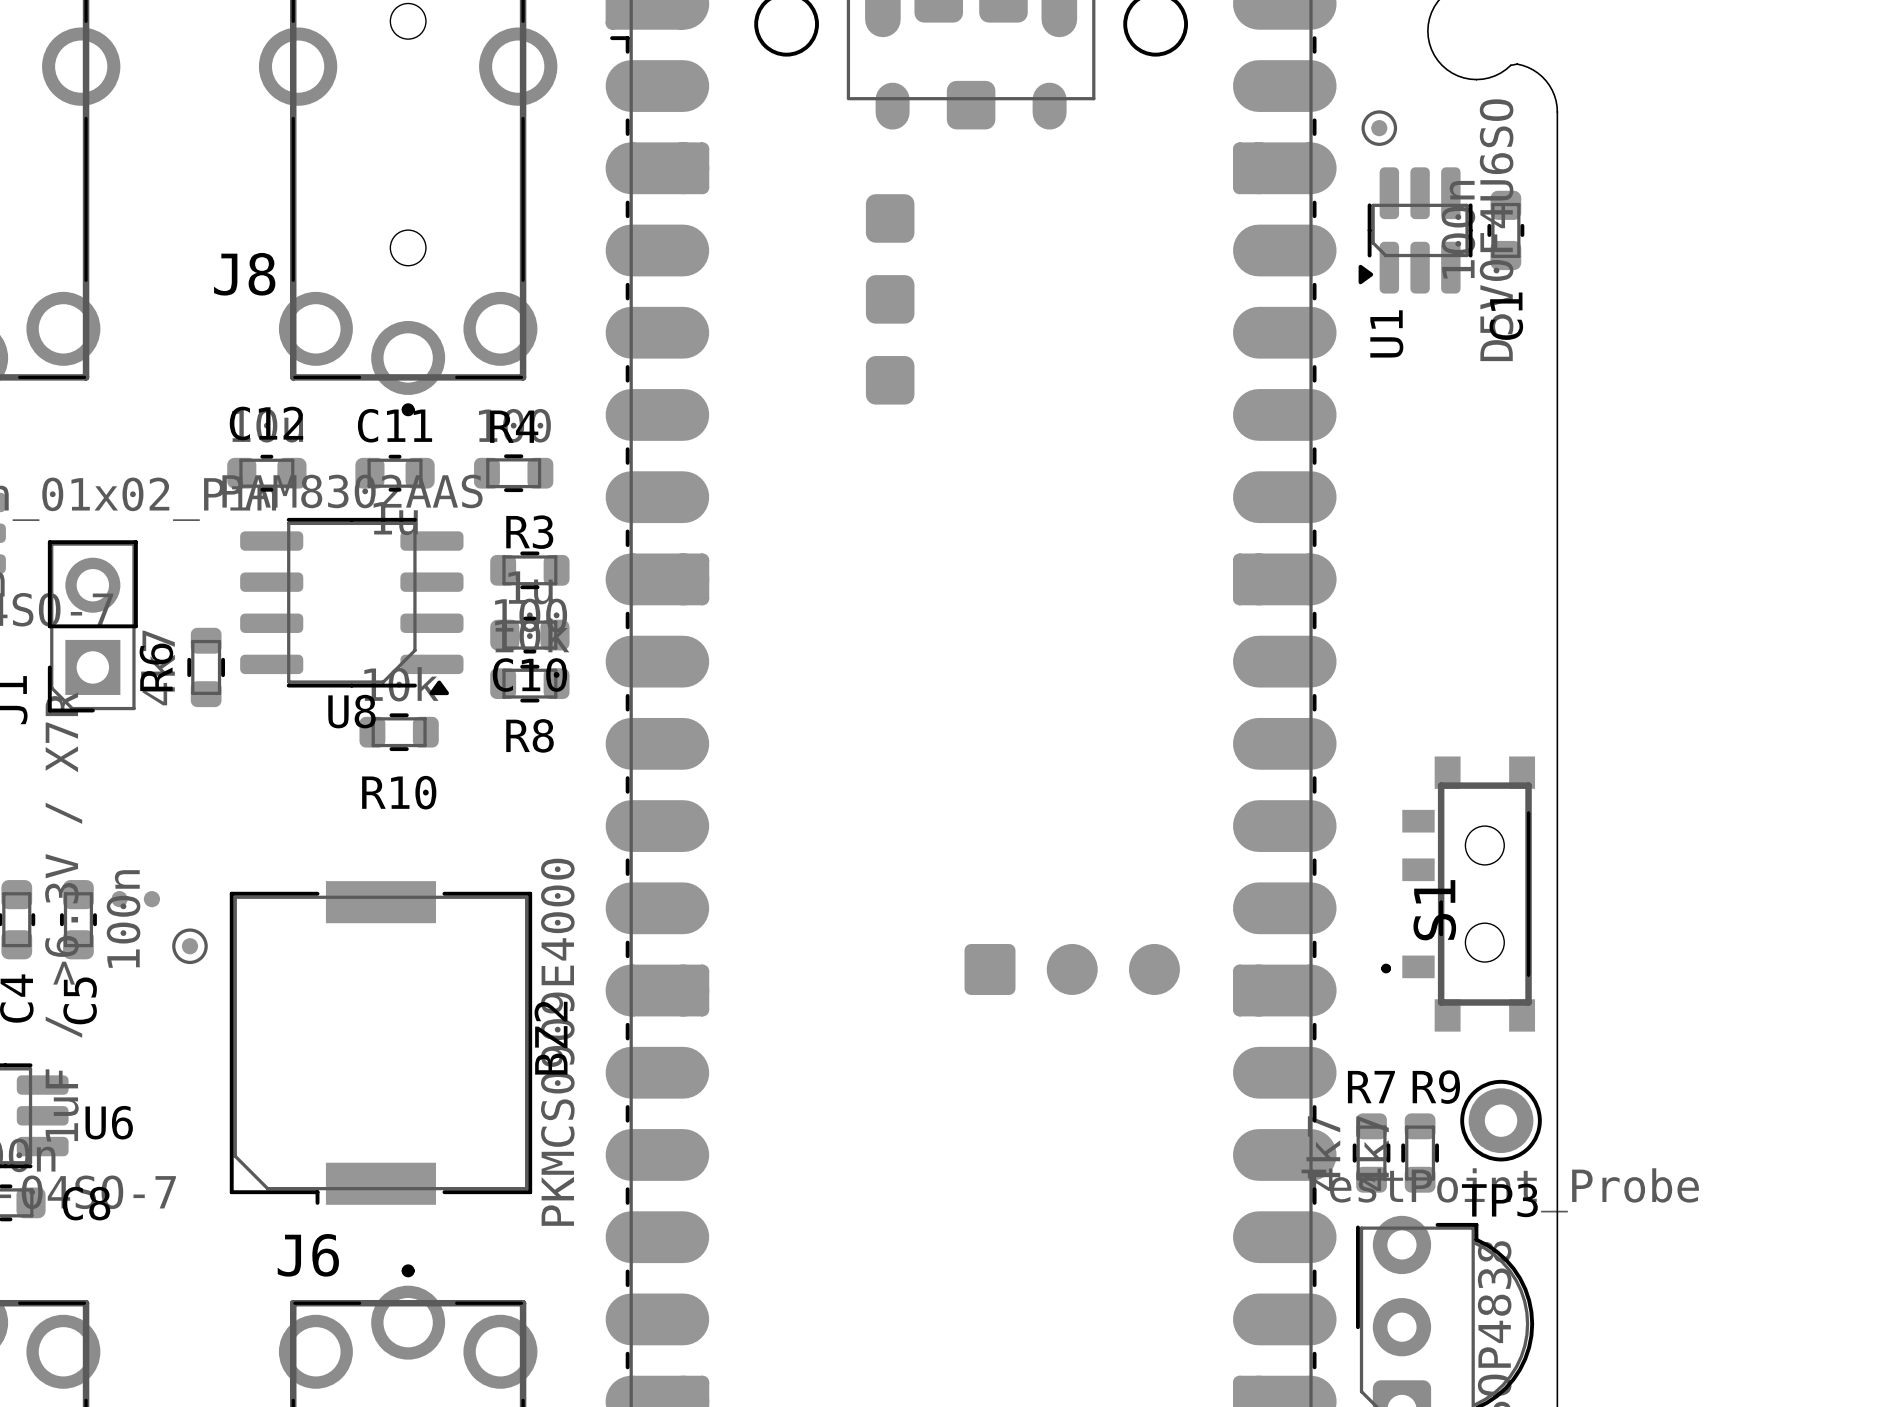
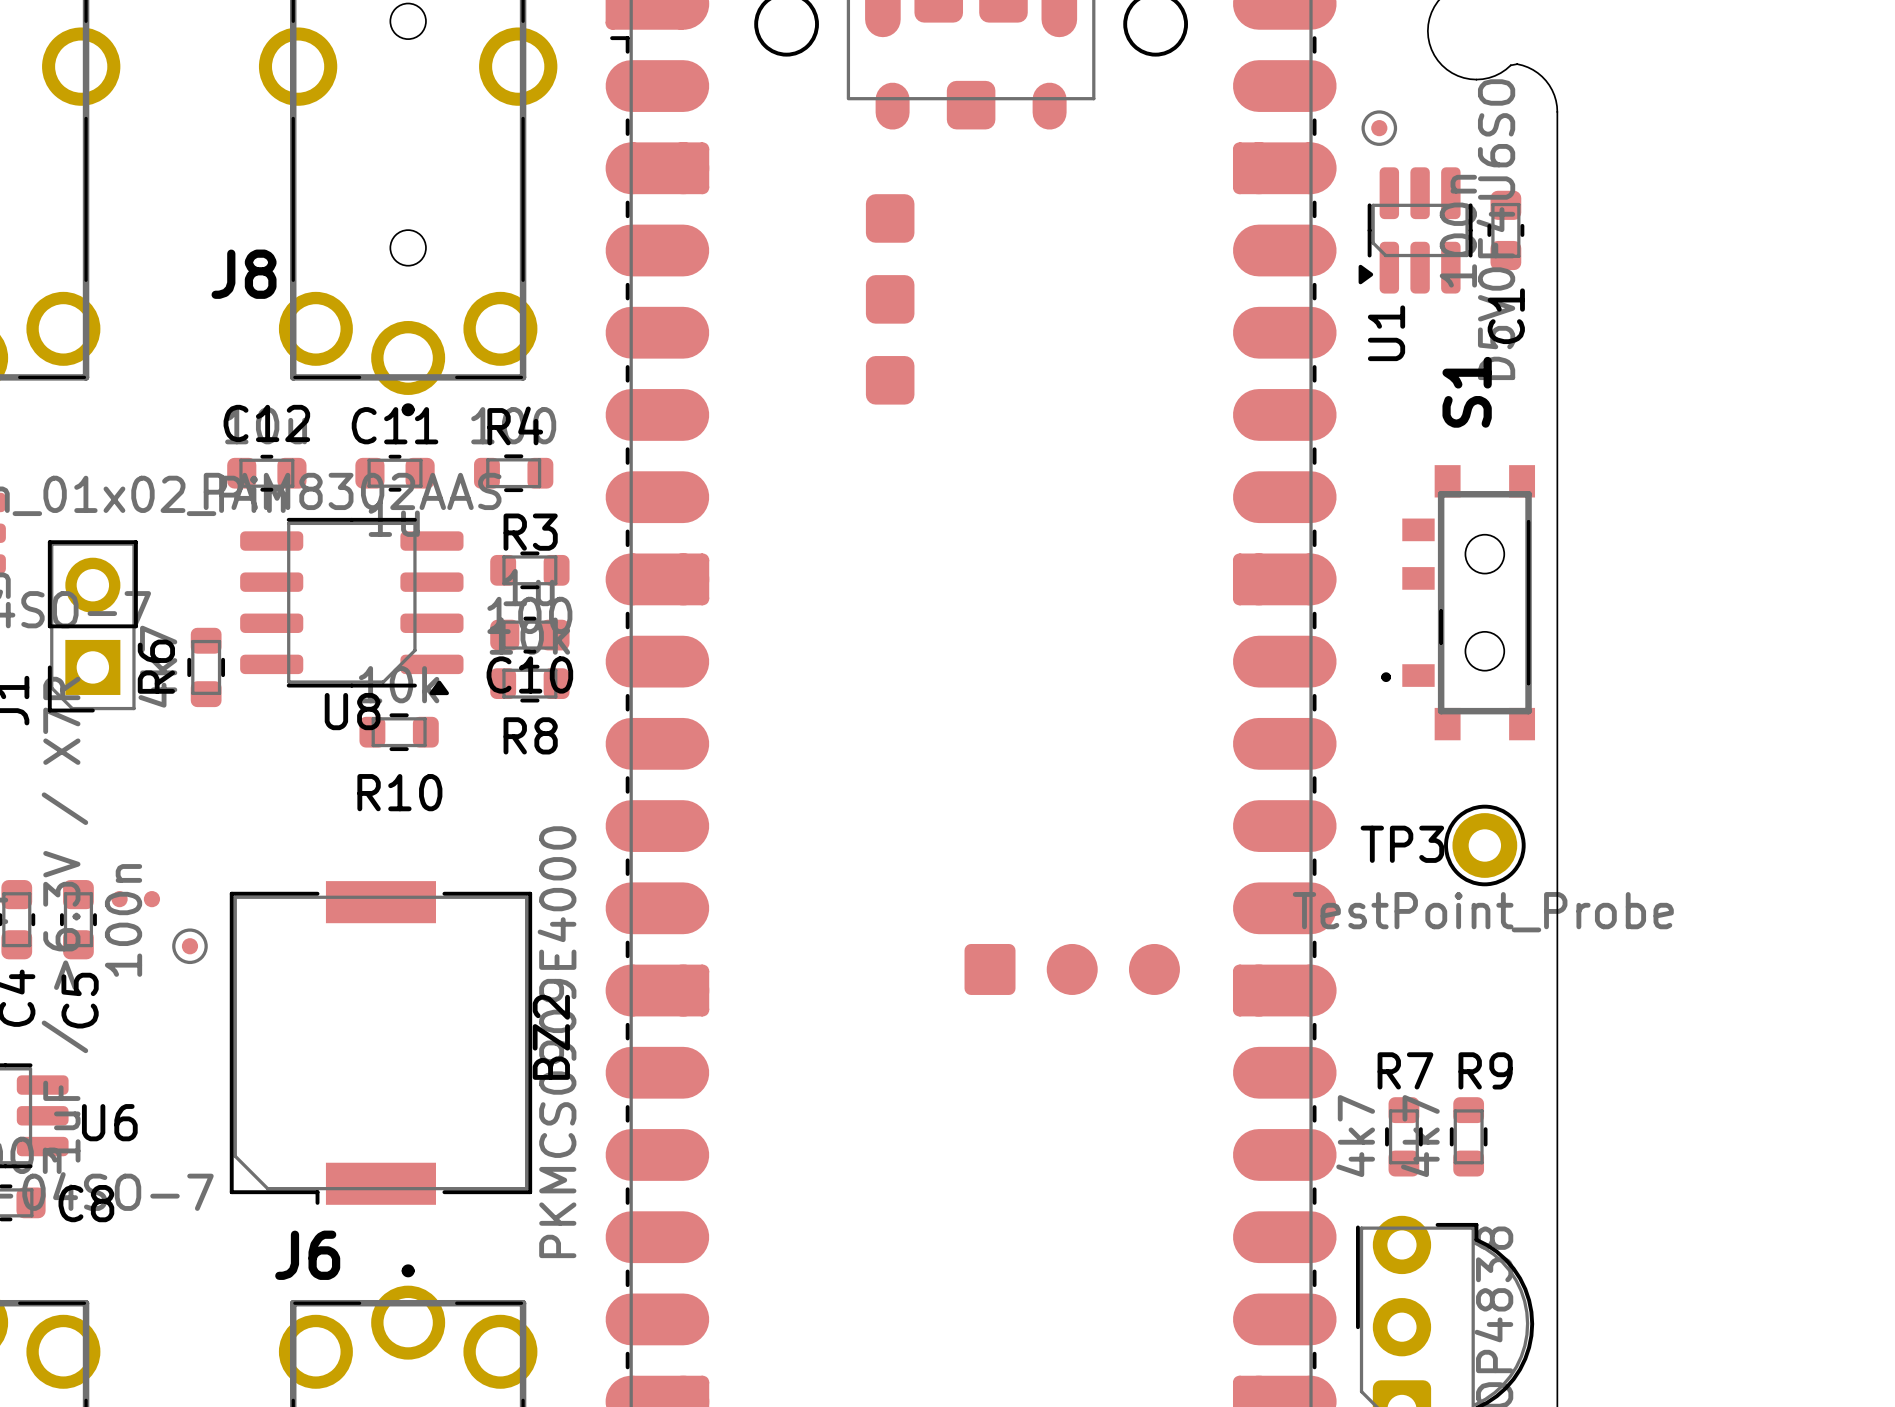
S1 position: (1458, 894) -> (1458, 602)
S1 name position: S1 (1434, 910) -> S1 (1467, 392)
TP3 position: (1501, 1120) -> (1484, 845)
R7 position: (1371, 1153) -> (1403, 1136)
R9 position: (1420, 1153) -> (1468, 1136)
TP3 name position: TP3 (1499, 1200) -> TP3 (1402, 844)

